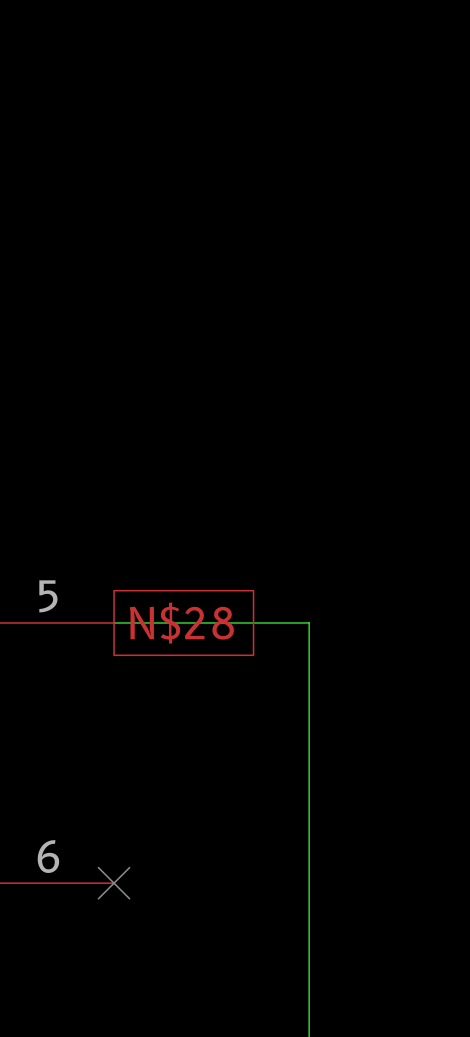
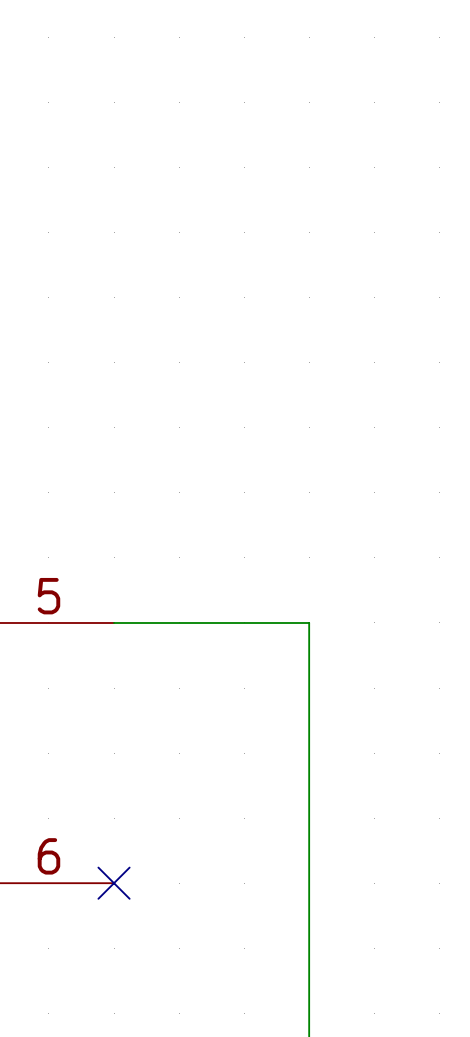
global label: N$28 (181, 622) -> none

